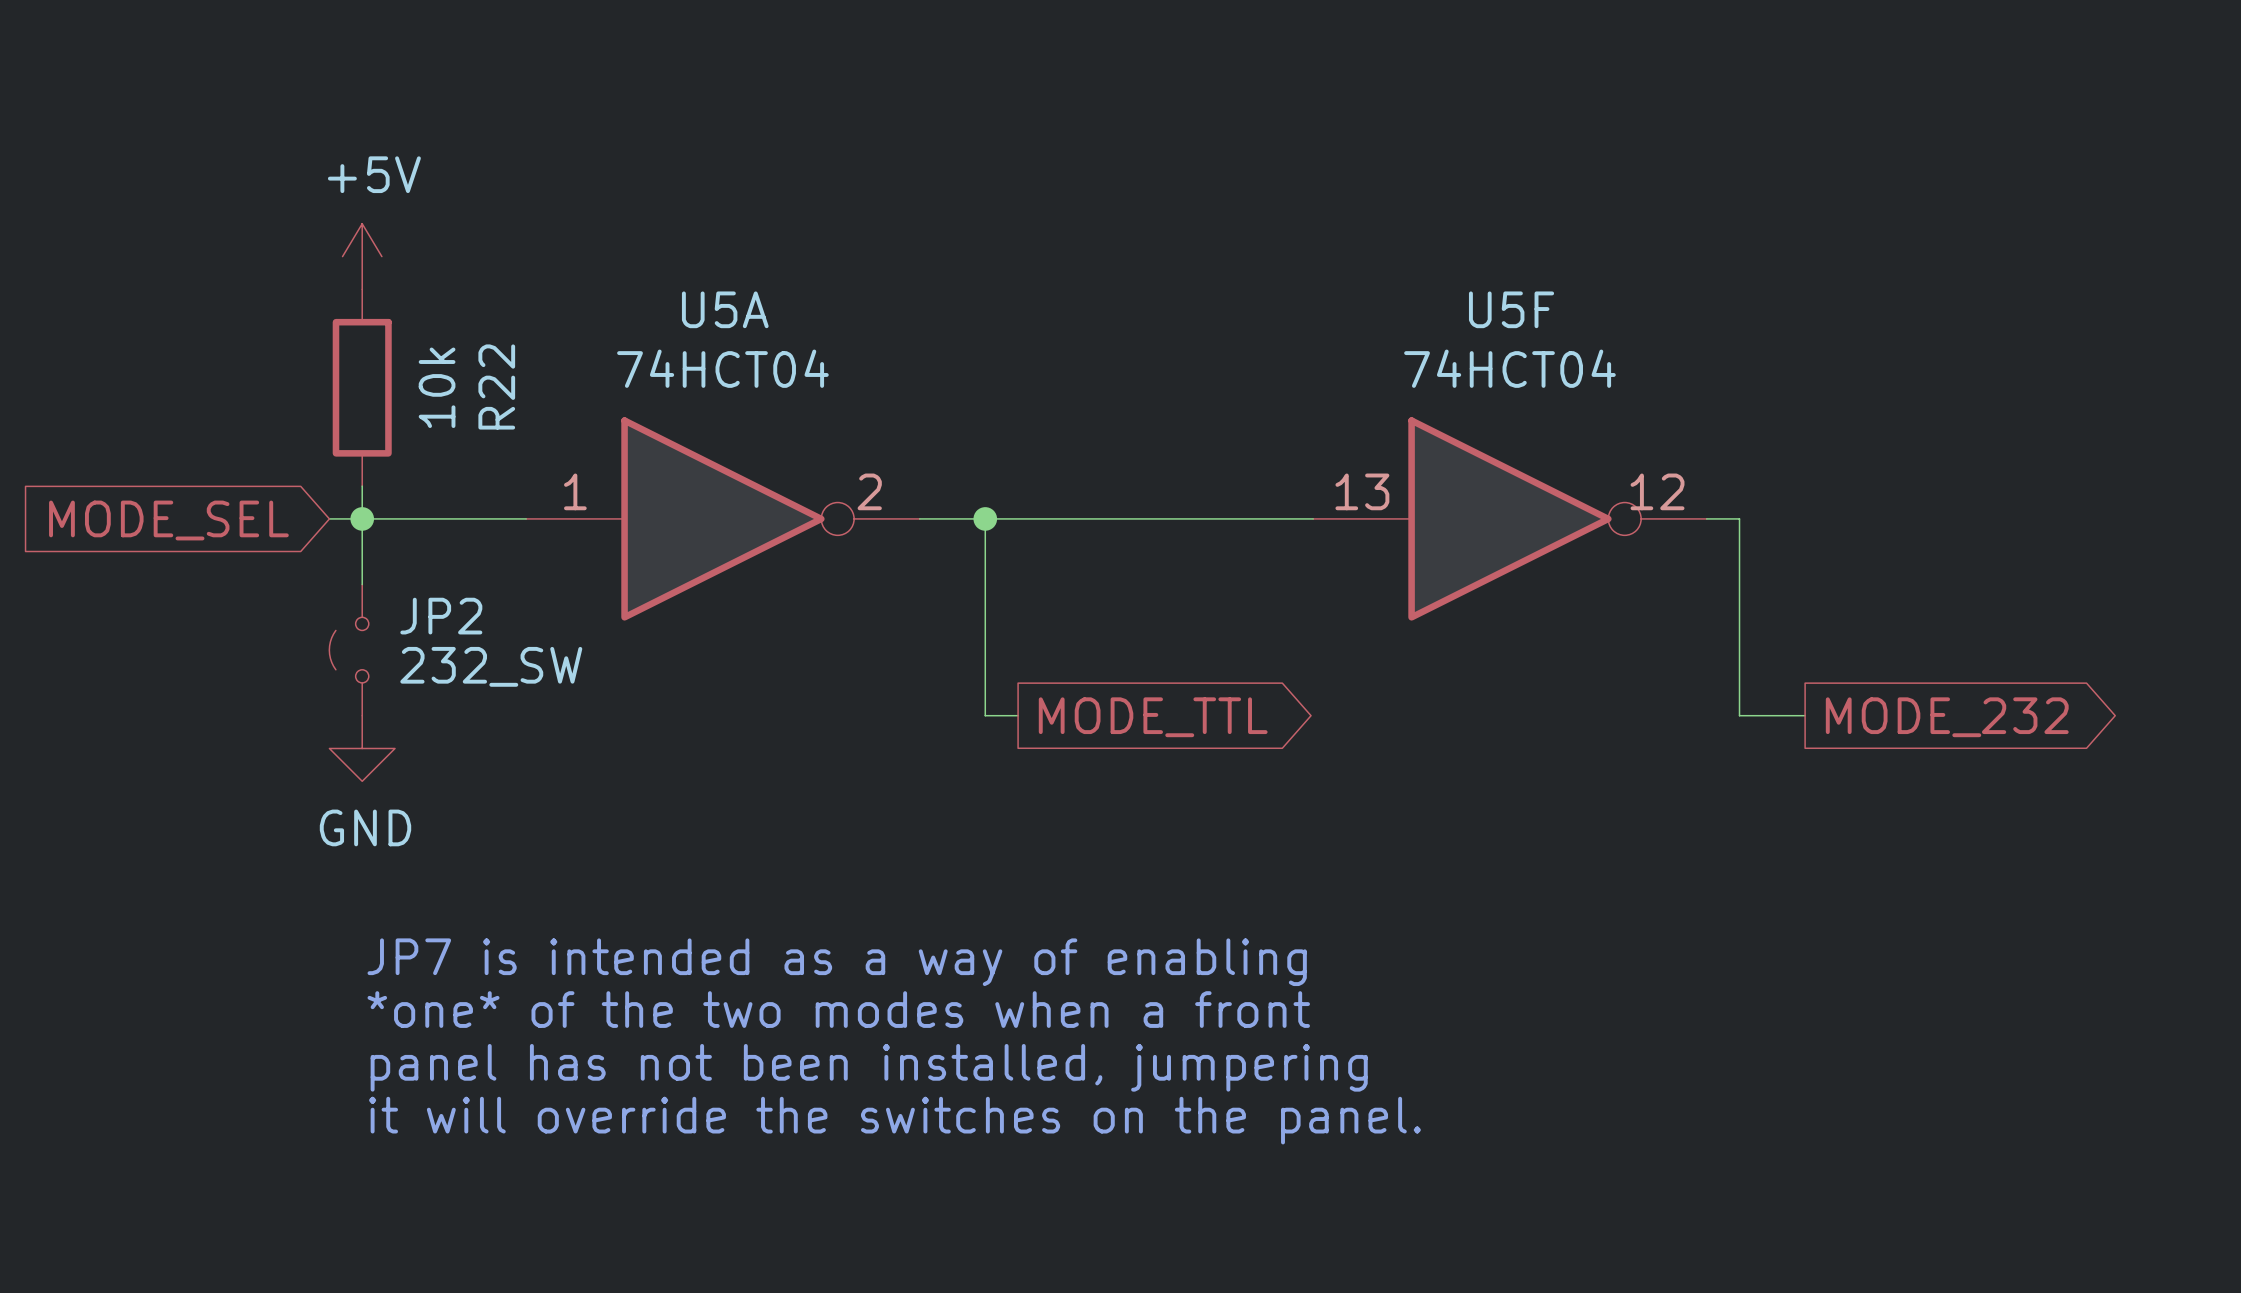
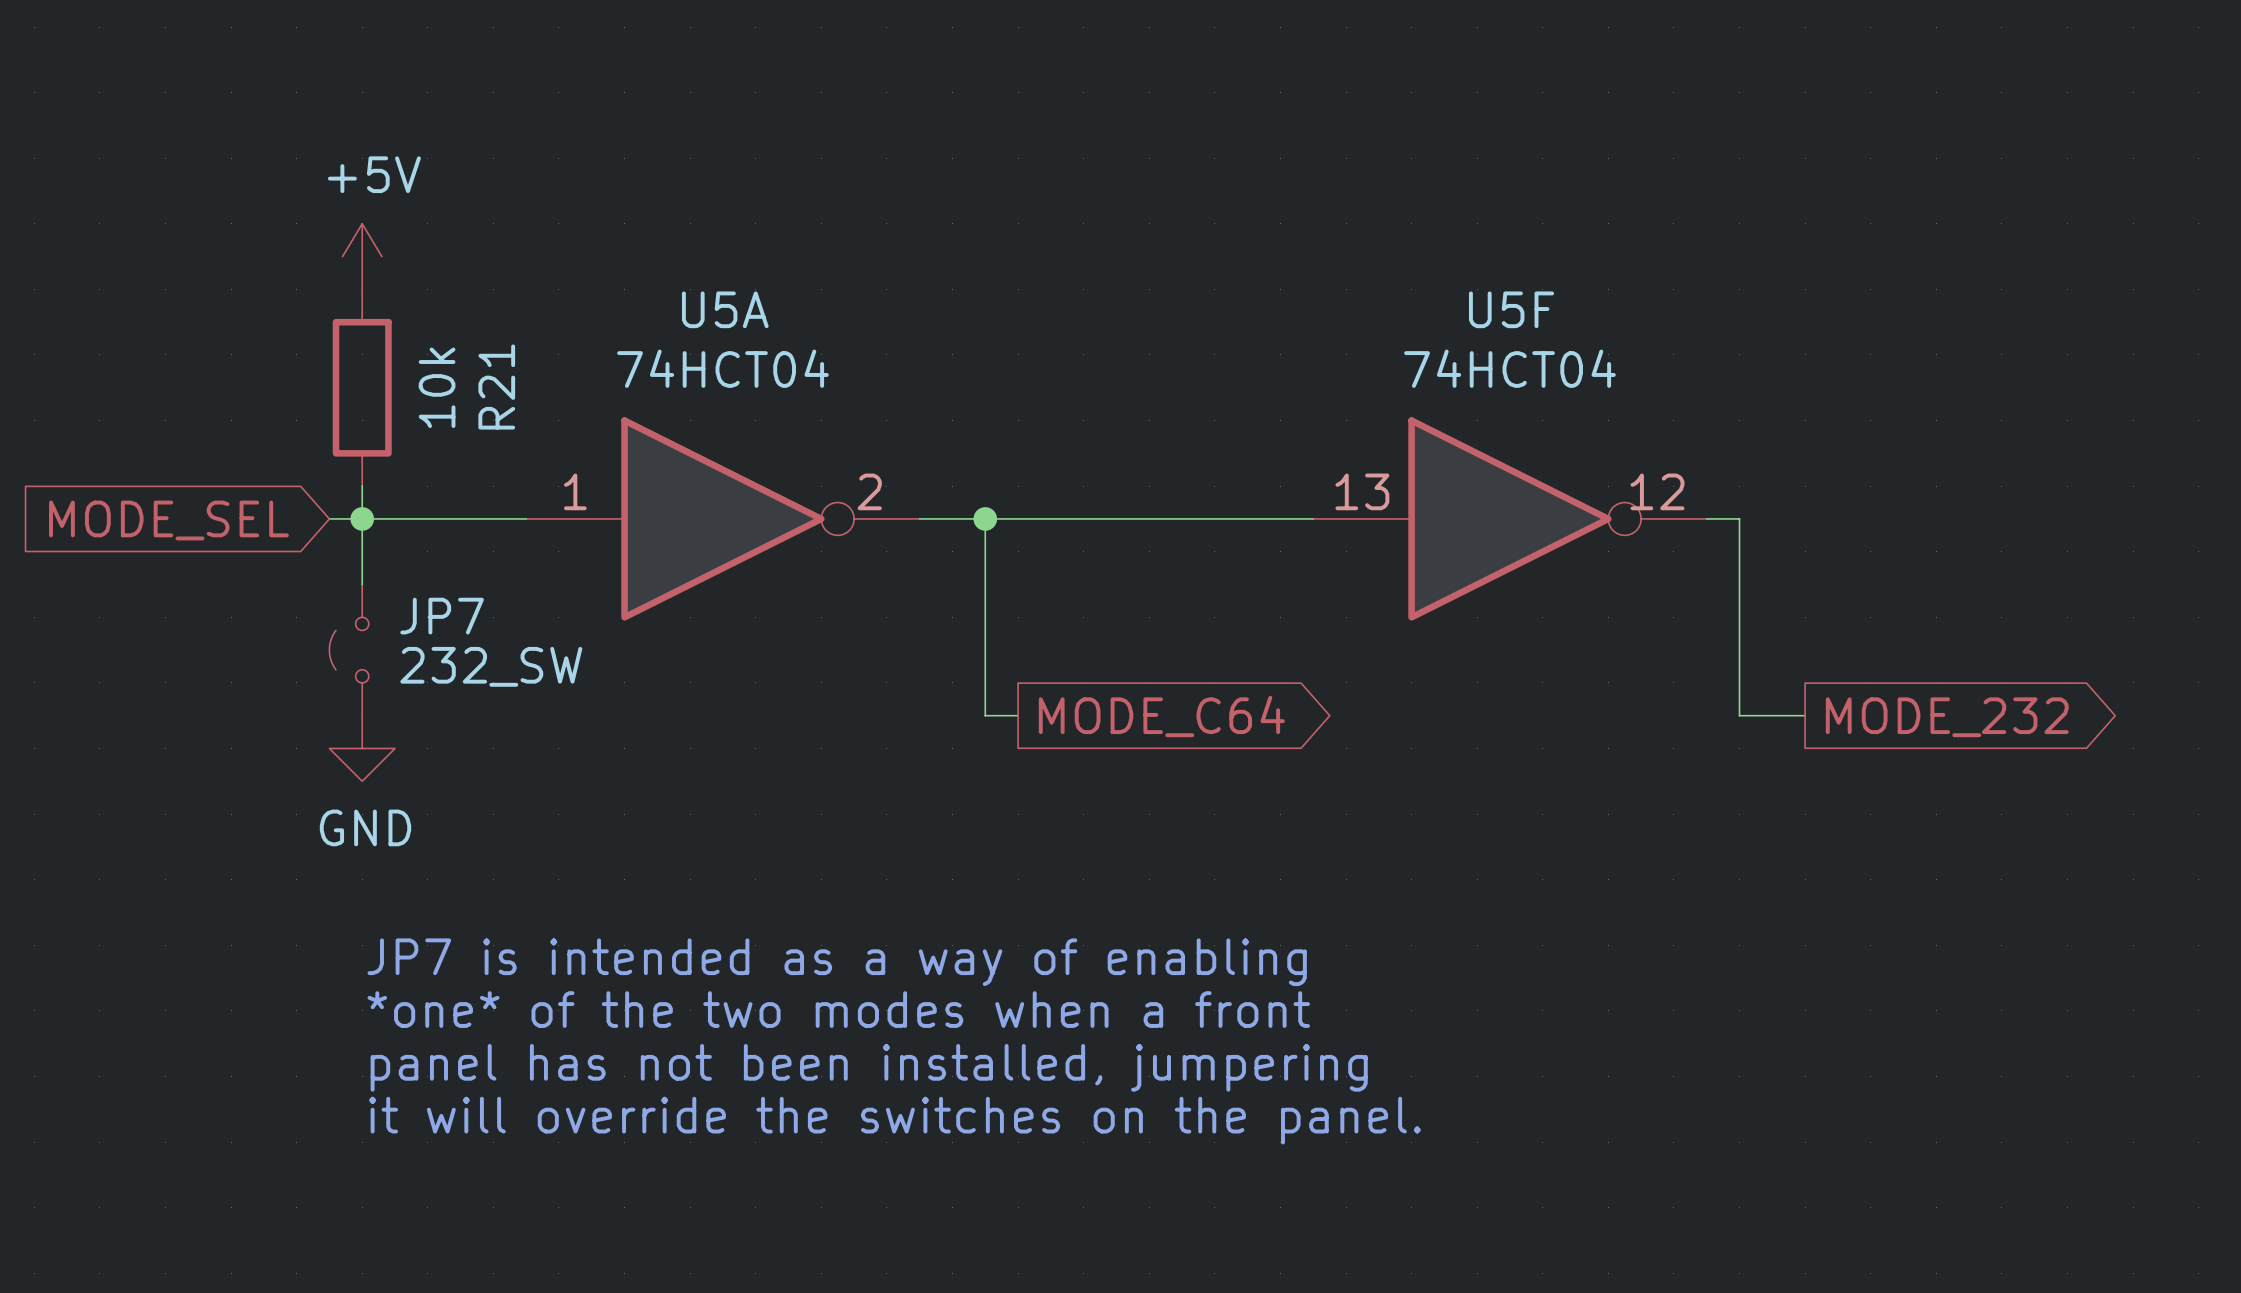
R22 name: R22 (496, 386) -> R21 (496, 386)
JP2 name: JP2 (441, 616) -> JP7 (442, 616)
global label: MODE_TTL (1153, 717) -> MODE_C64 (1161, 716)

